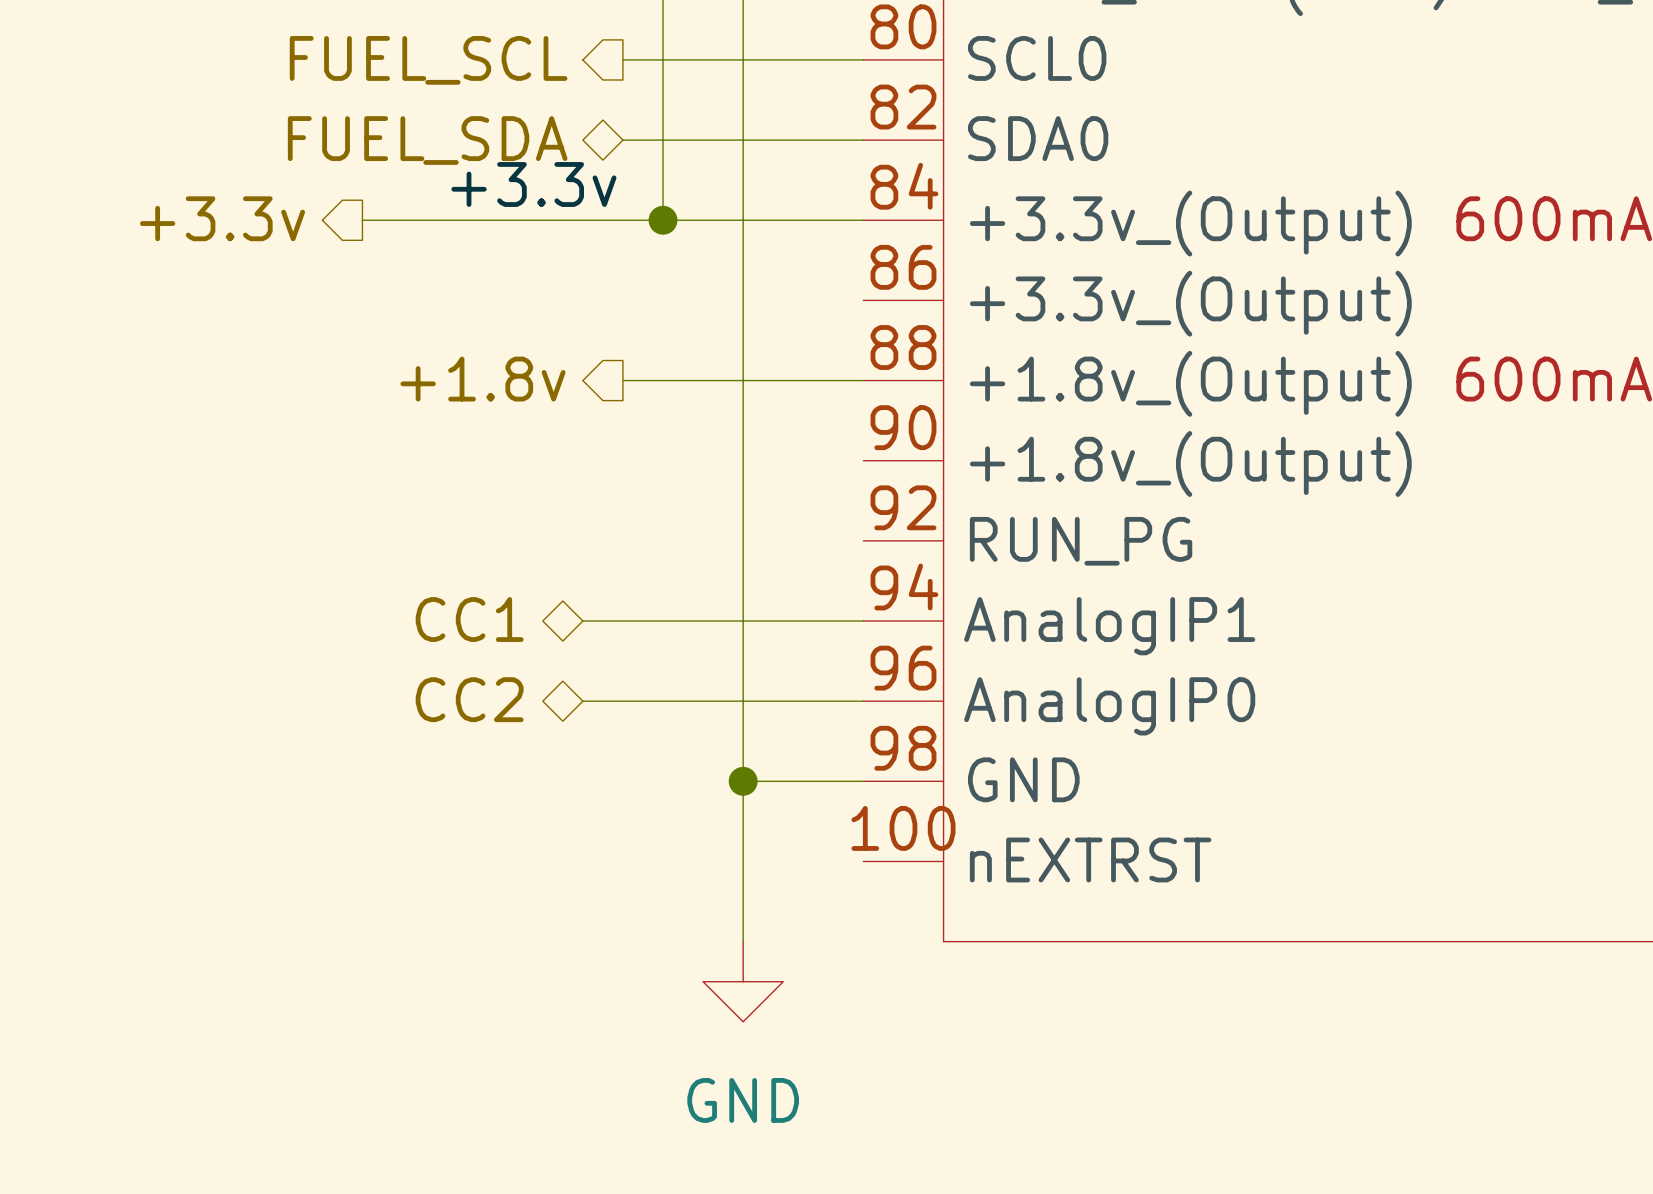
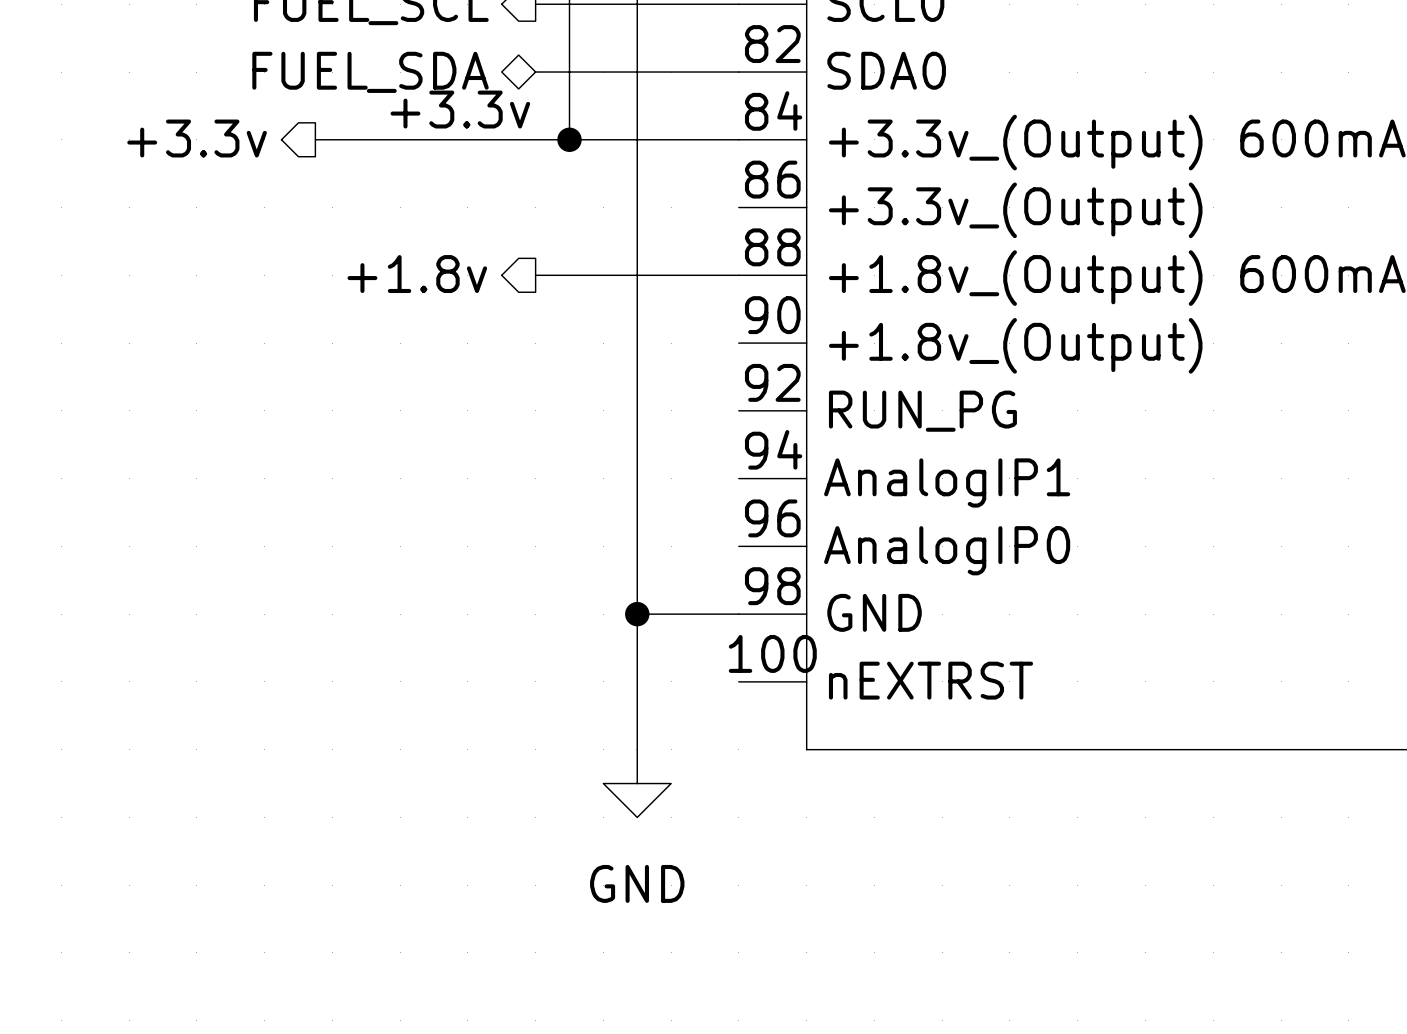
hierarchical label: CC1 (469, 619) -> none
wire: (582, 621) (863, 621) -> none
hierarchical label: CC2 (469, 699) -> none
wire: (582, 701) (863, 701) -> none

